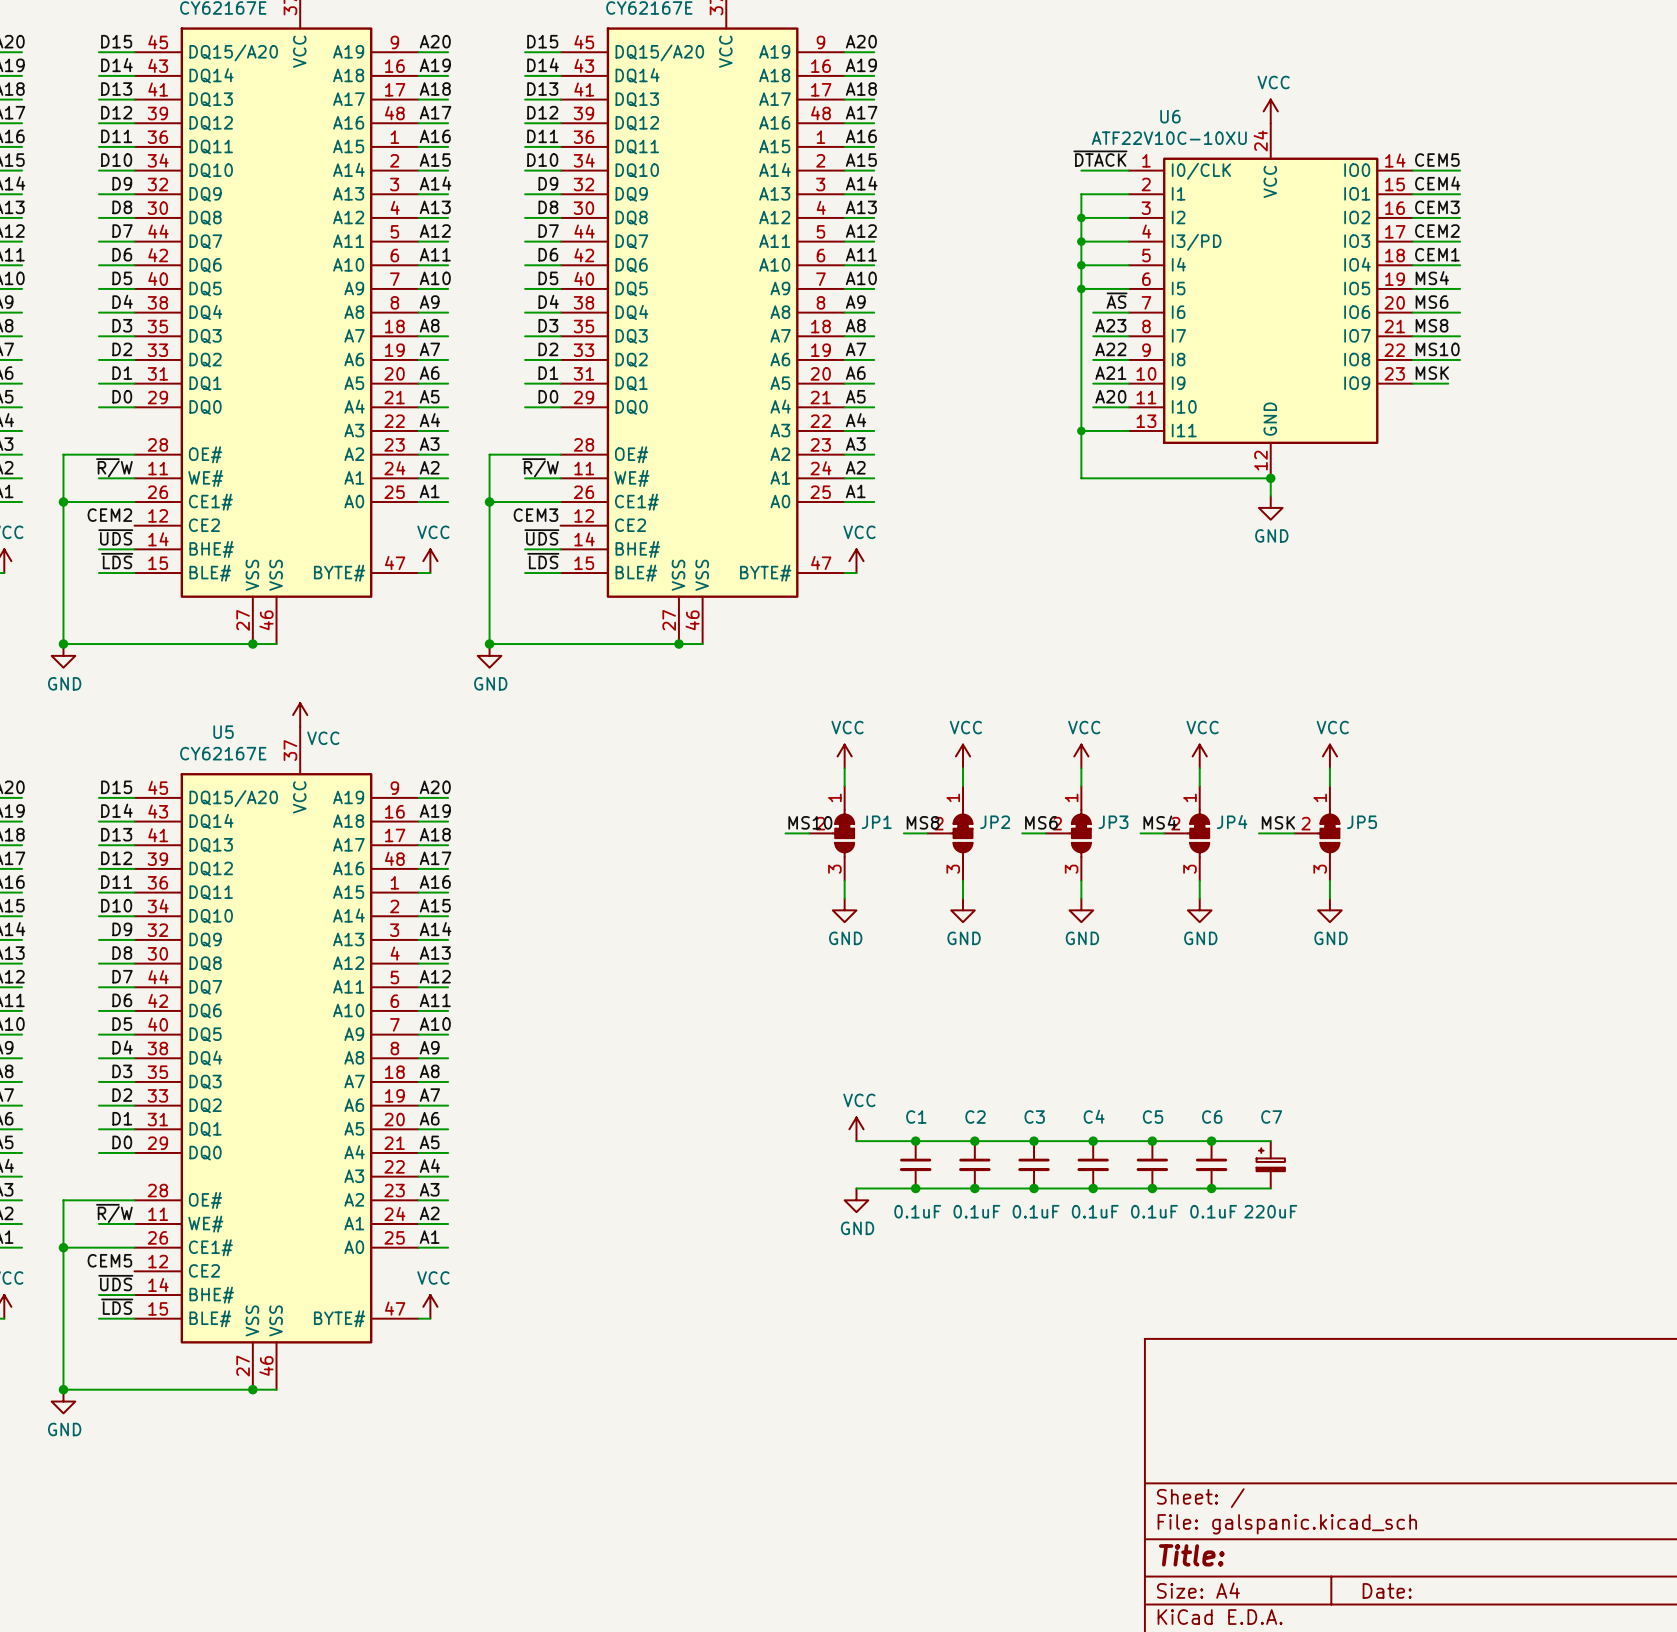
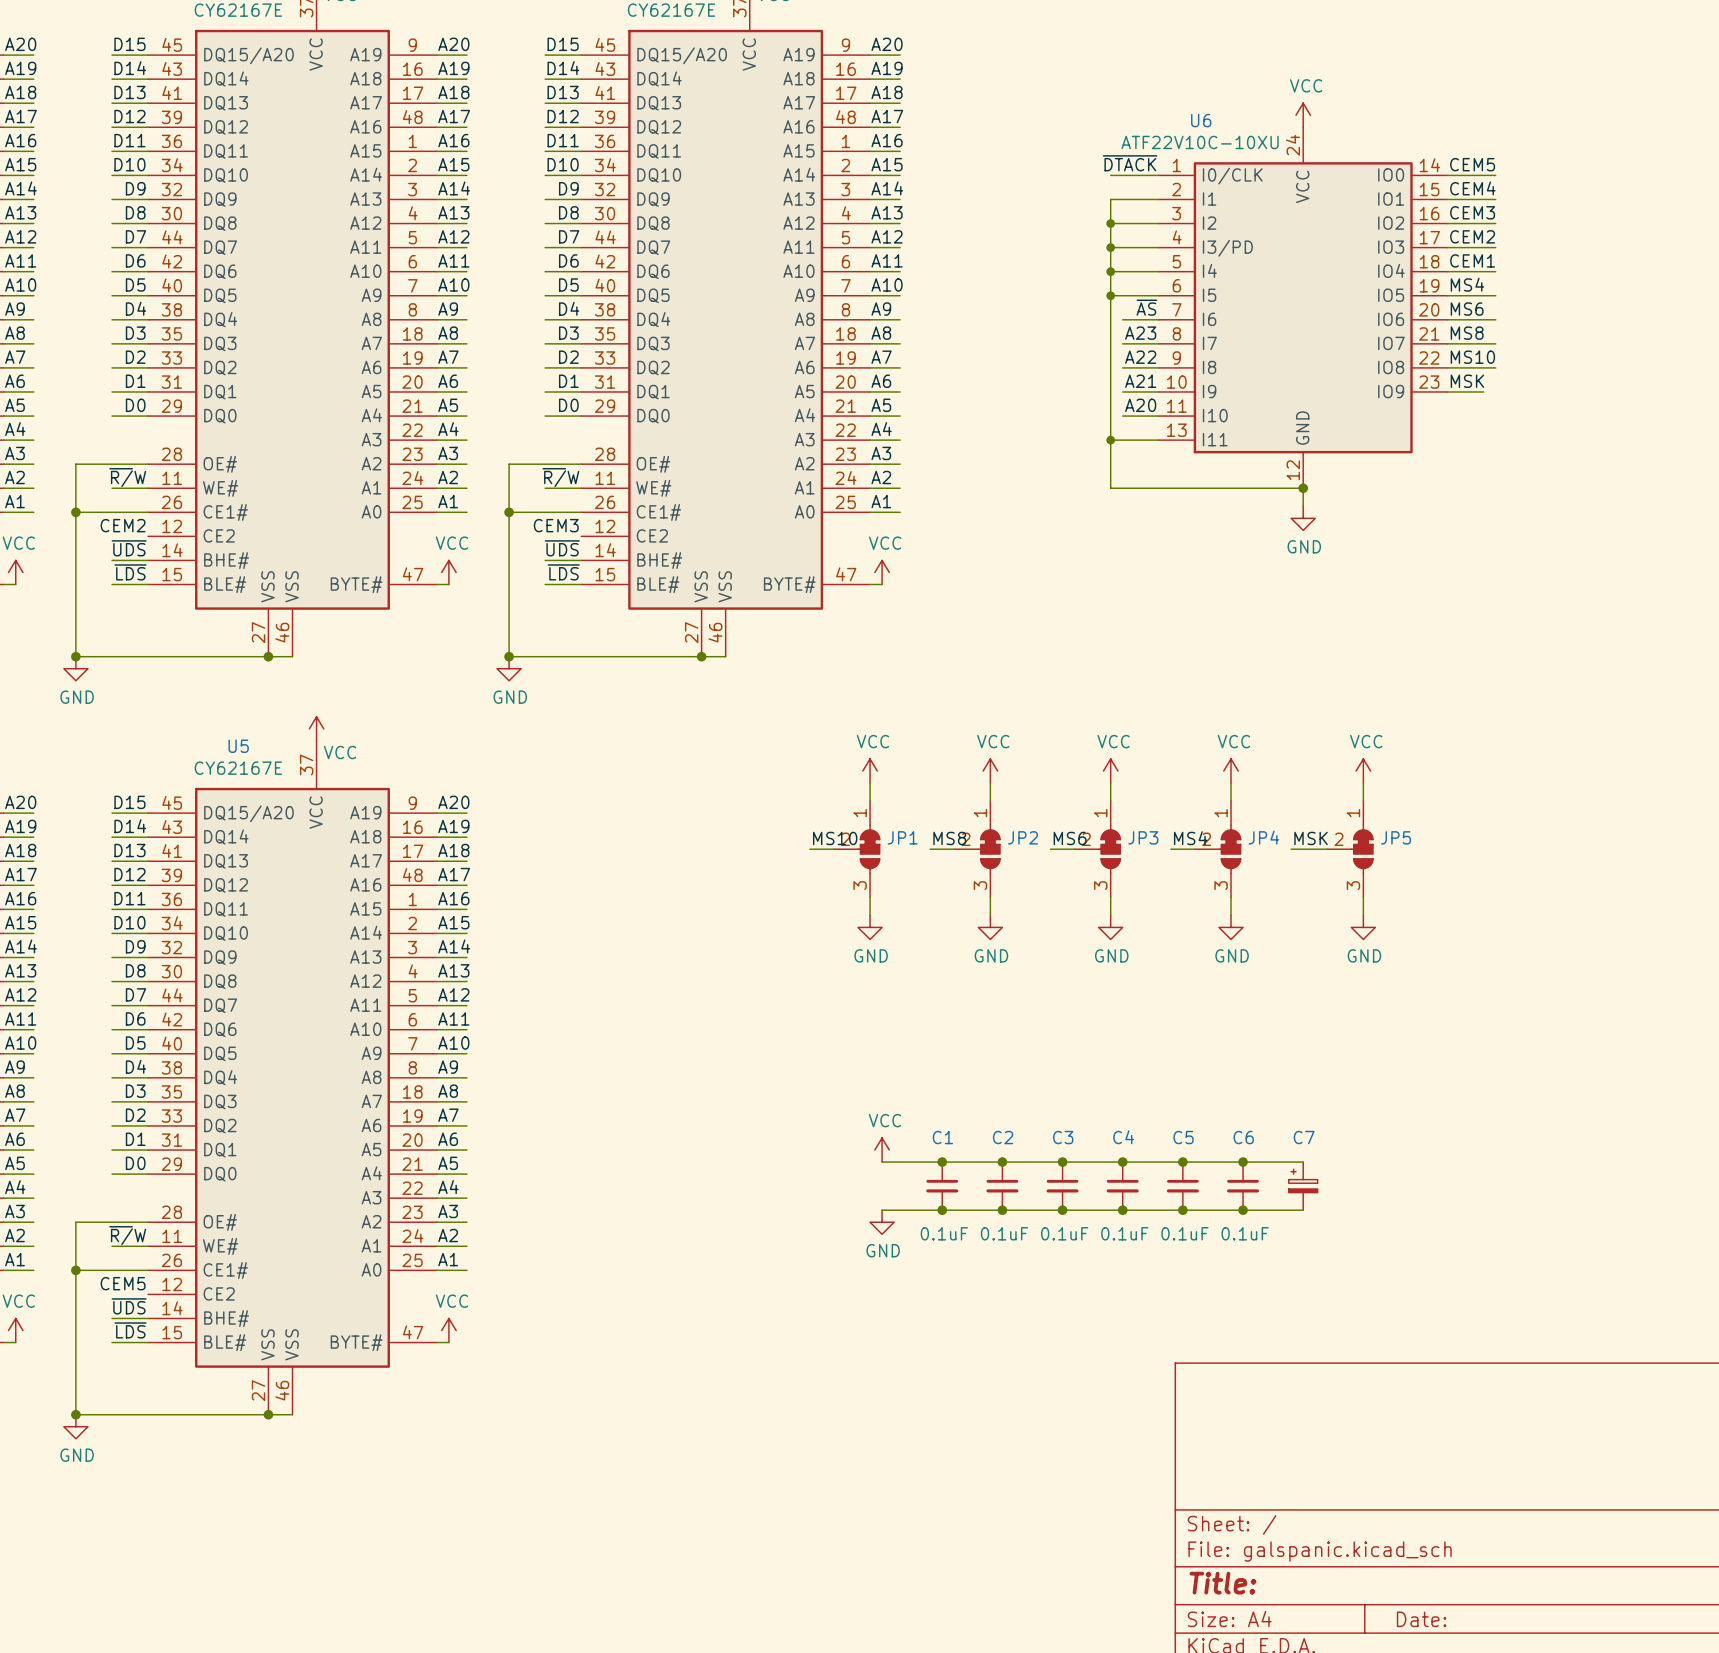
C7 value: 220uF (1270, 1211) -> none

